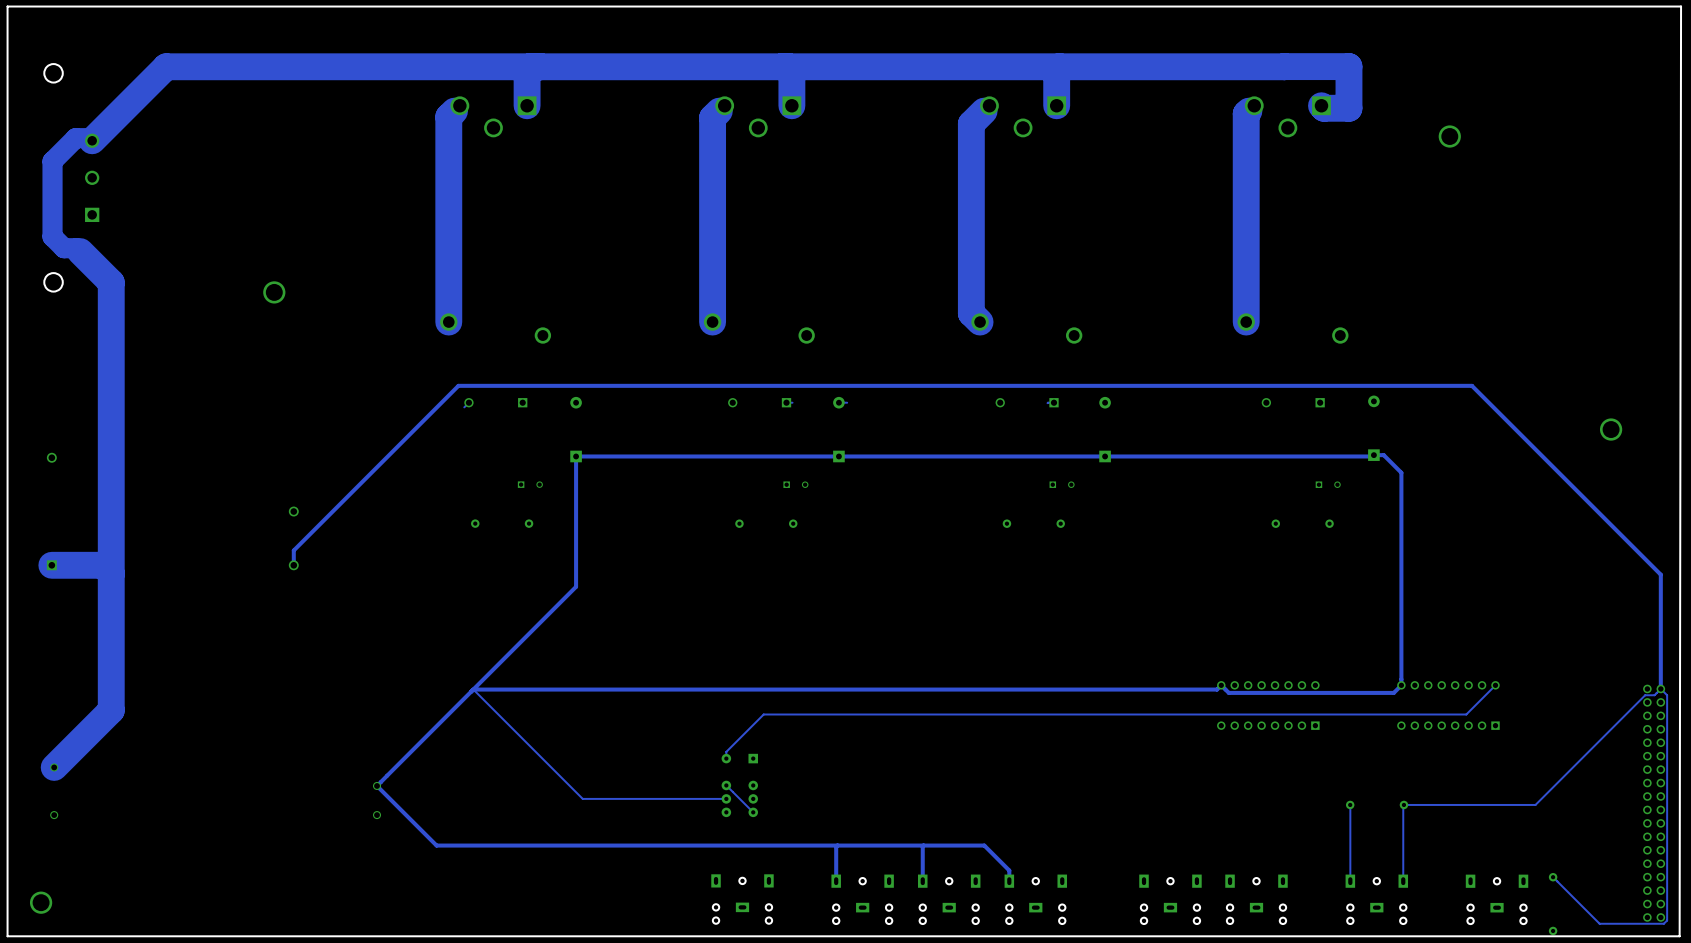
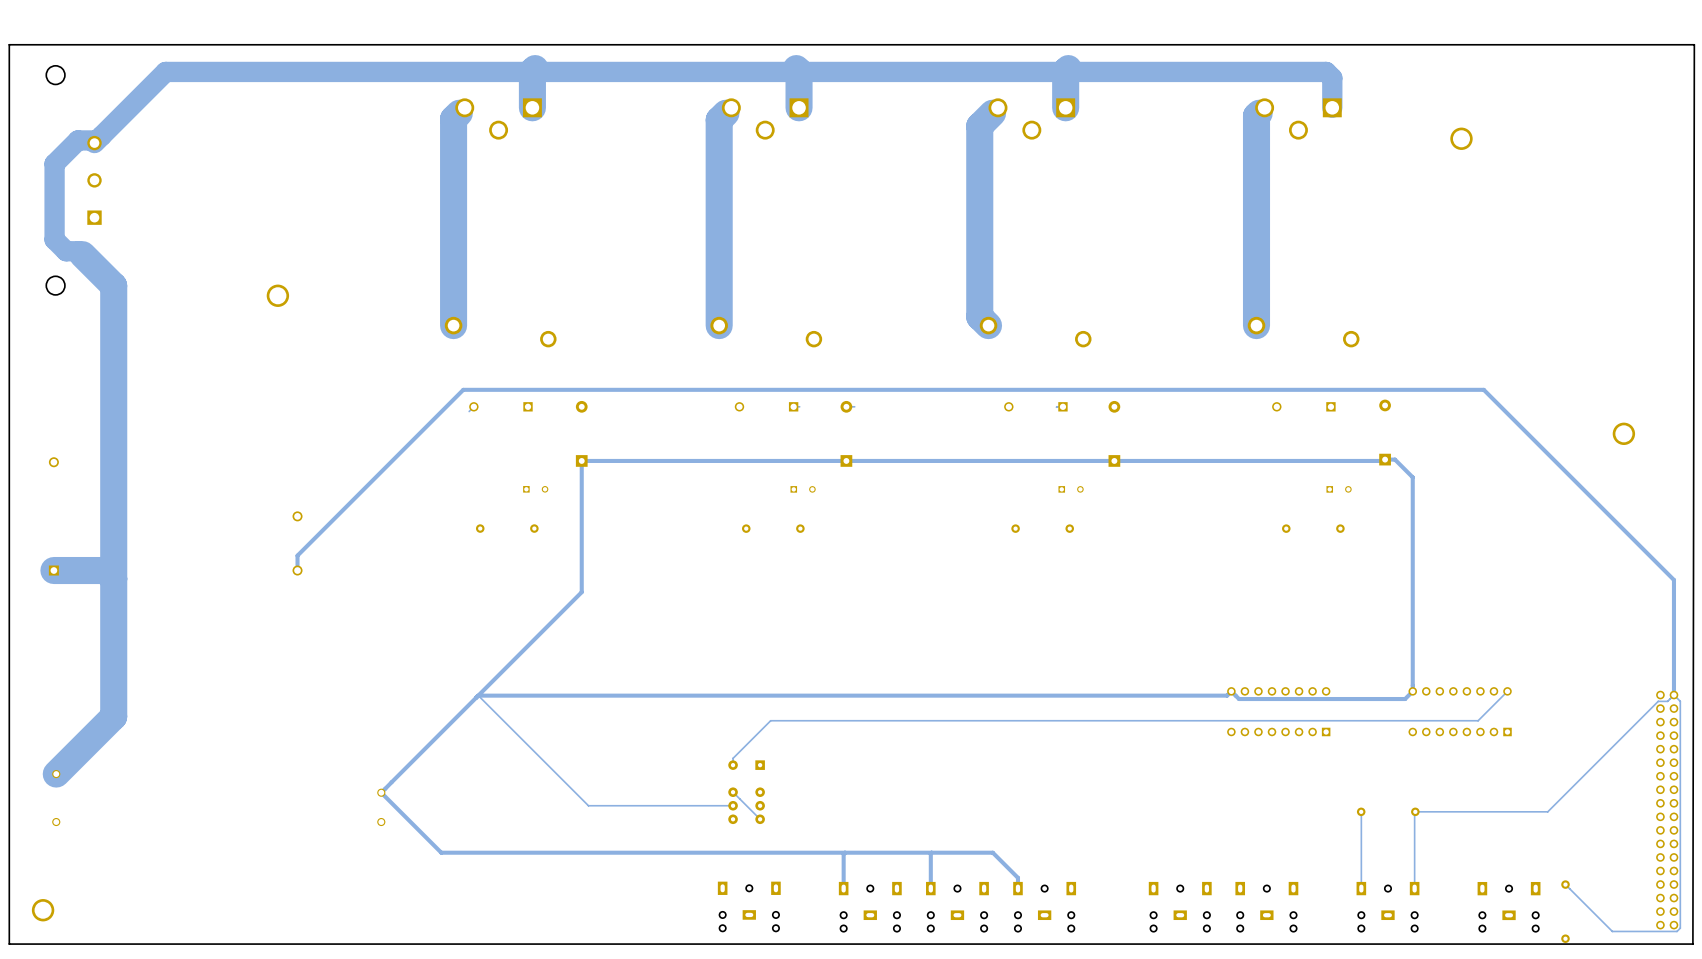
board edge: (7, 43) (7, 6) (1681, 6) (1679, 936) -> (9, 44) (1694, 44) (1692, 944)
track: (162, 70) (166, 66) (1348, 66) (1348, 108) (1324, 108) (1321, 105) -> (165, 71) (1326, 71) (1332, 78) (1332, 107)
track width: thick (162, 70) (92, 140) -> thin (165, 71) (94, 143)

